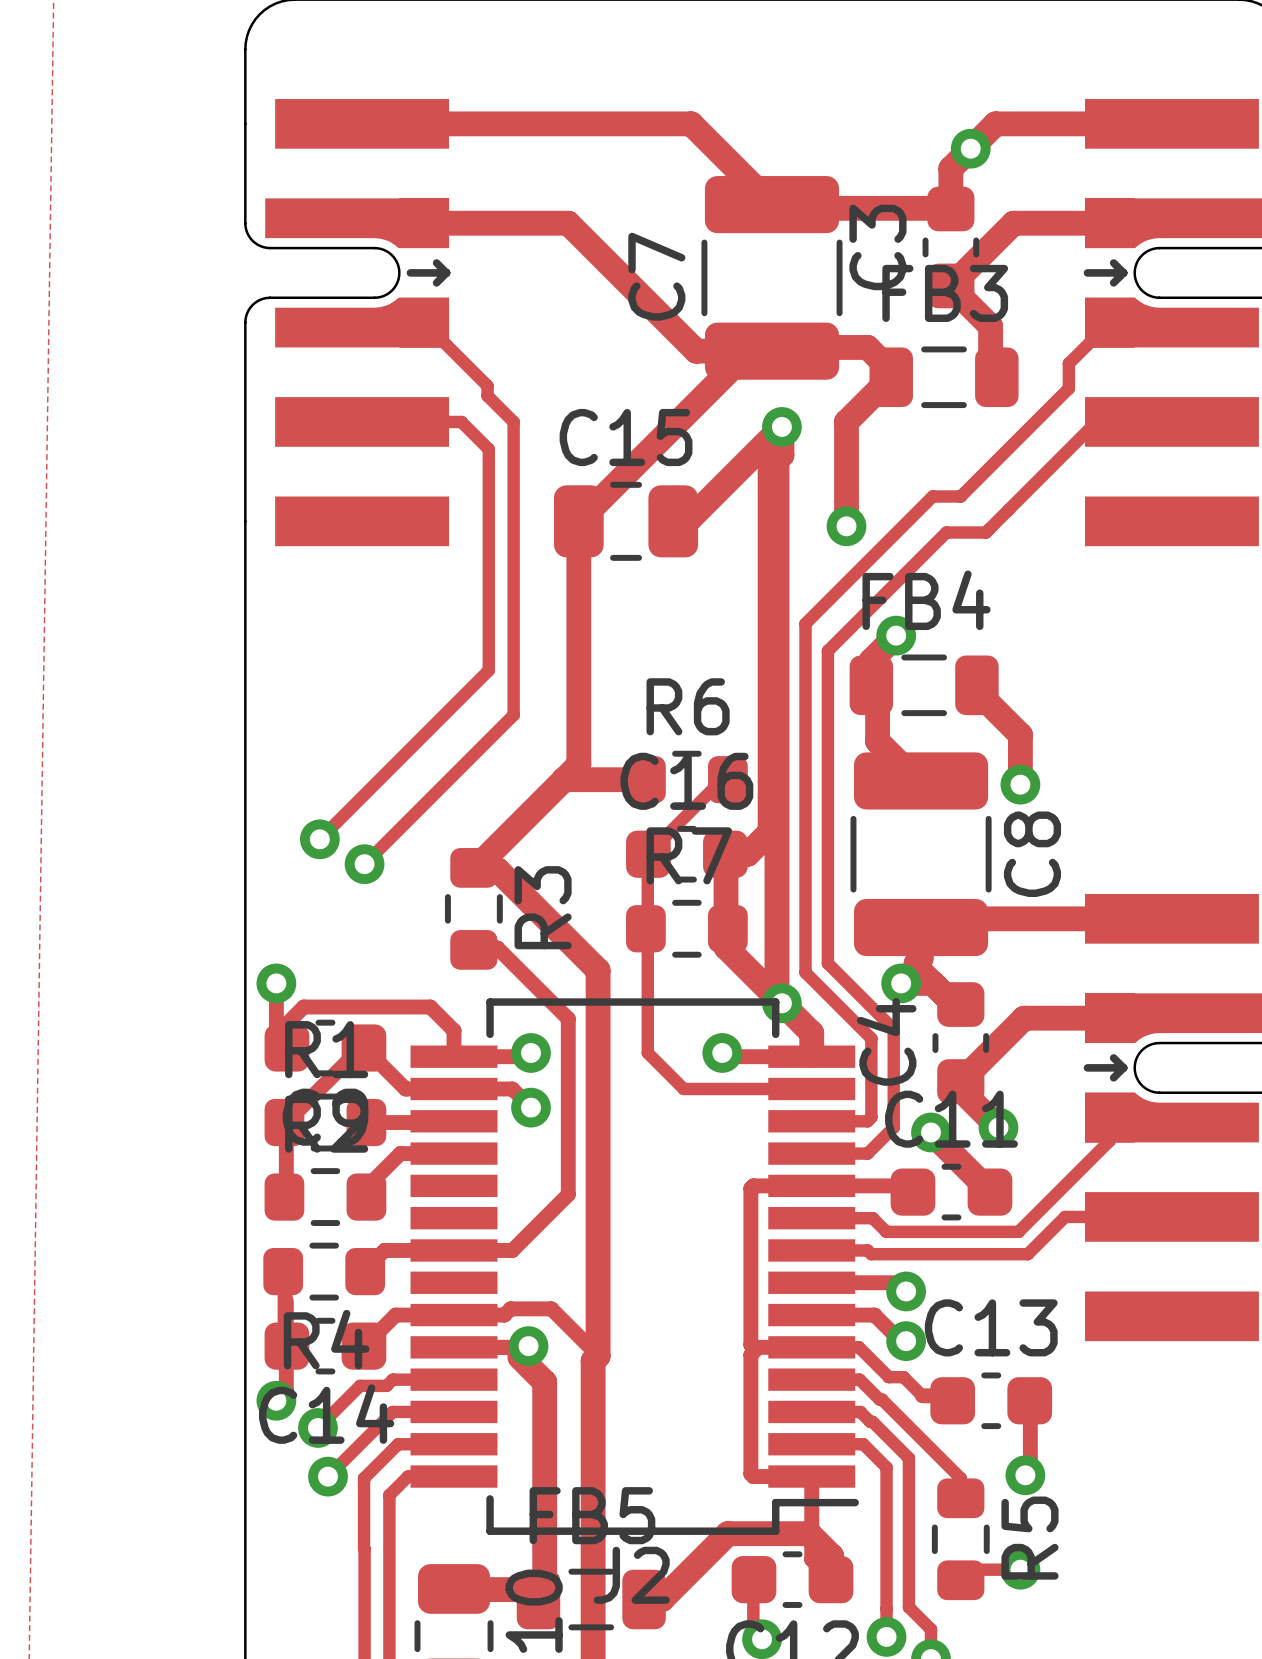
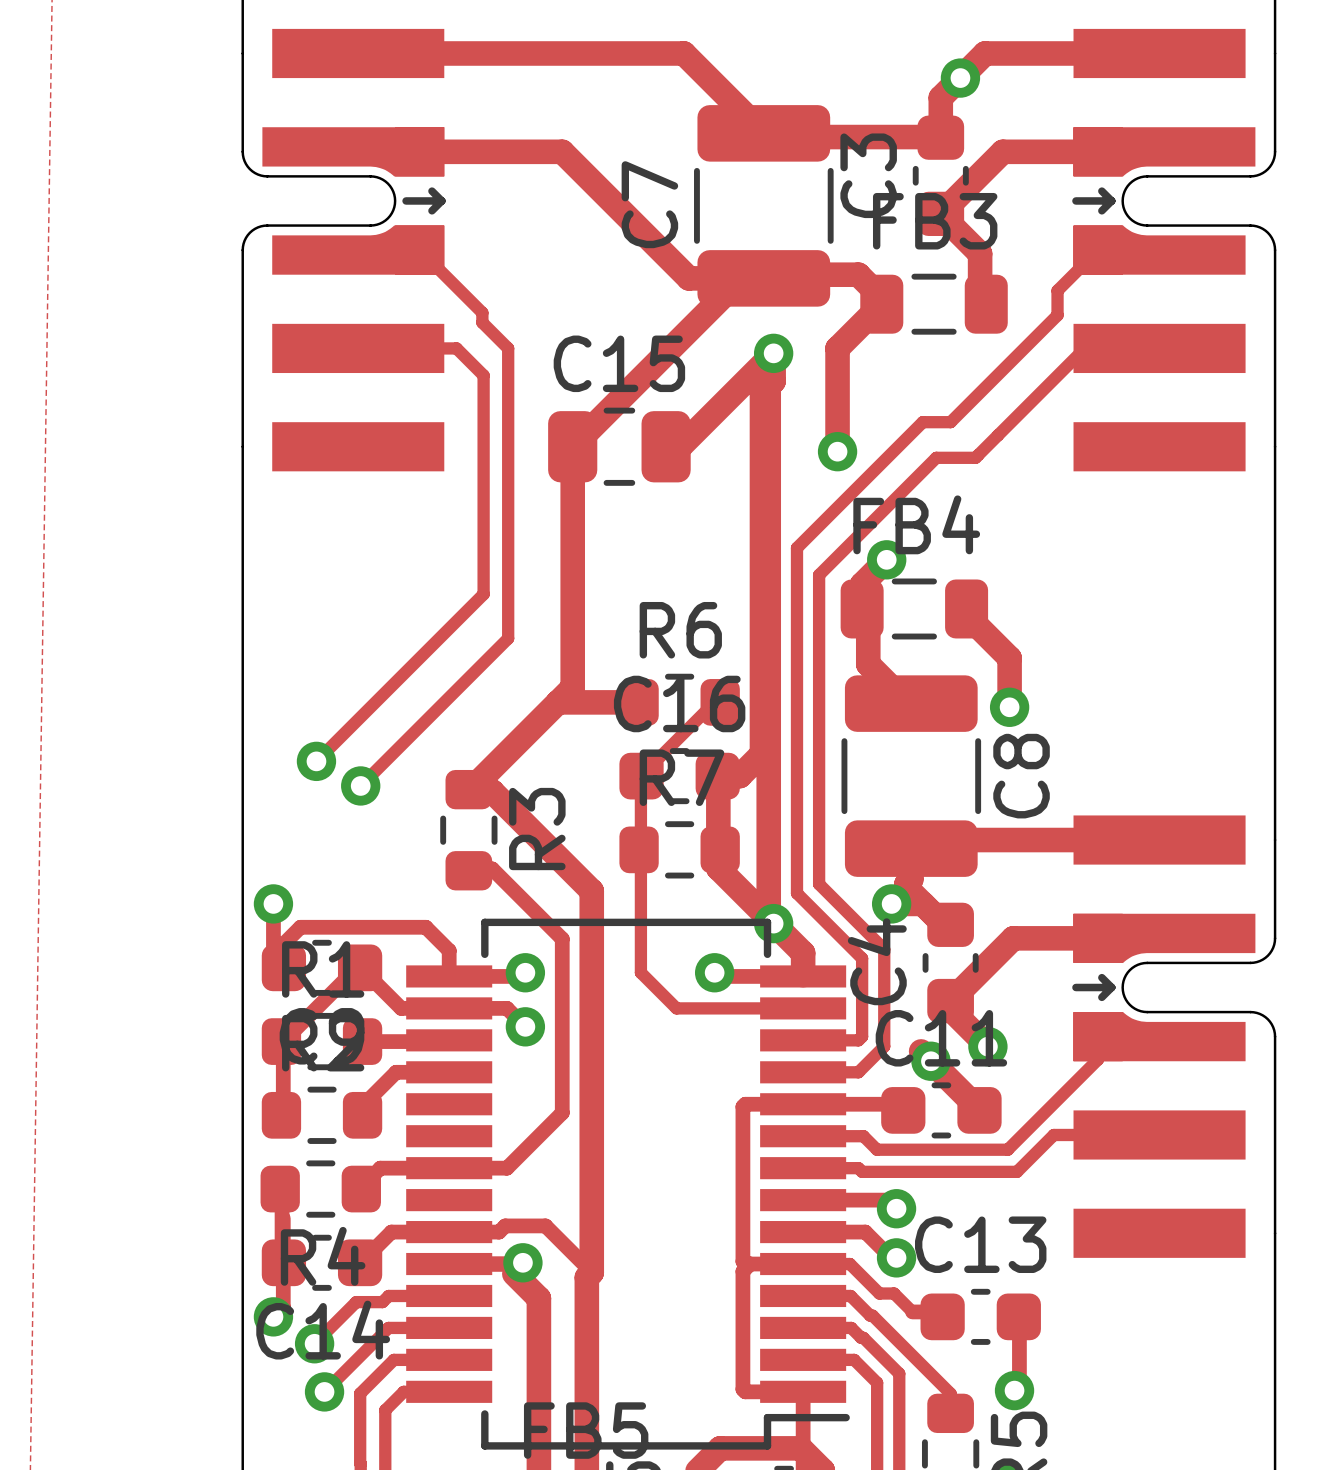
via position: (930, 1132) -> (930, 1061)

